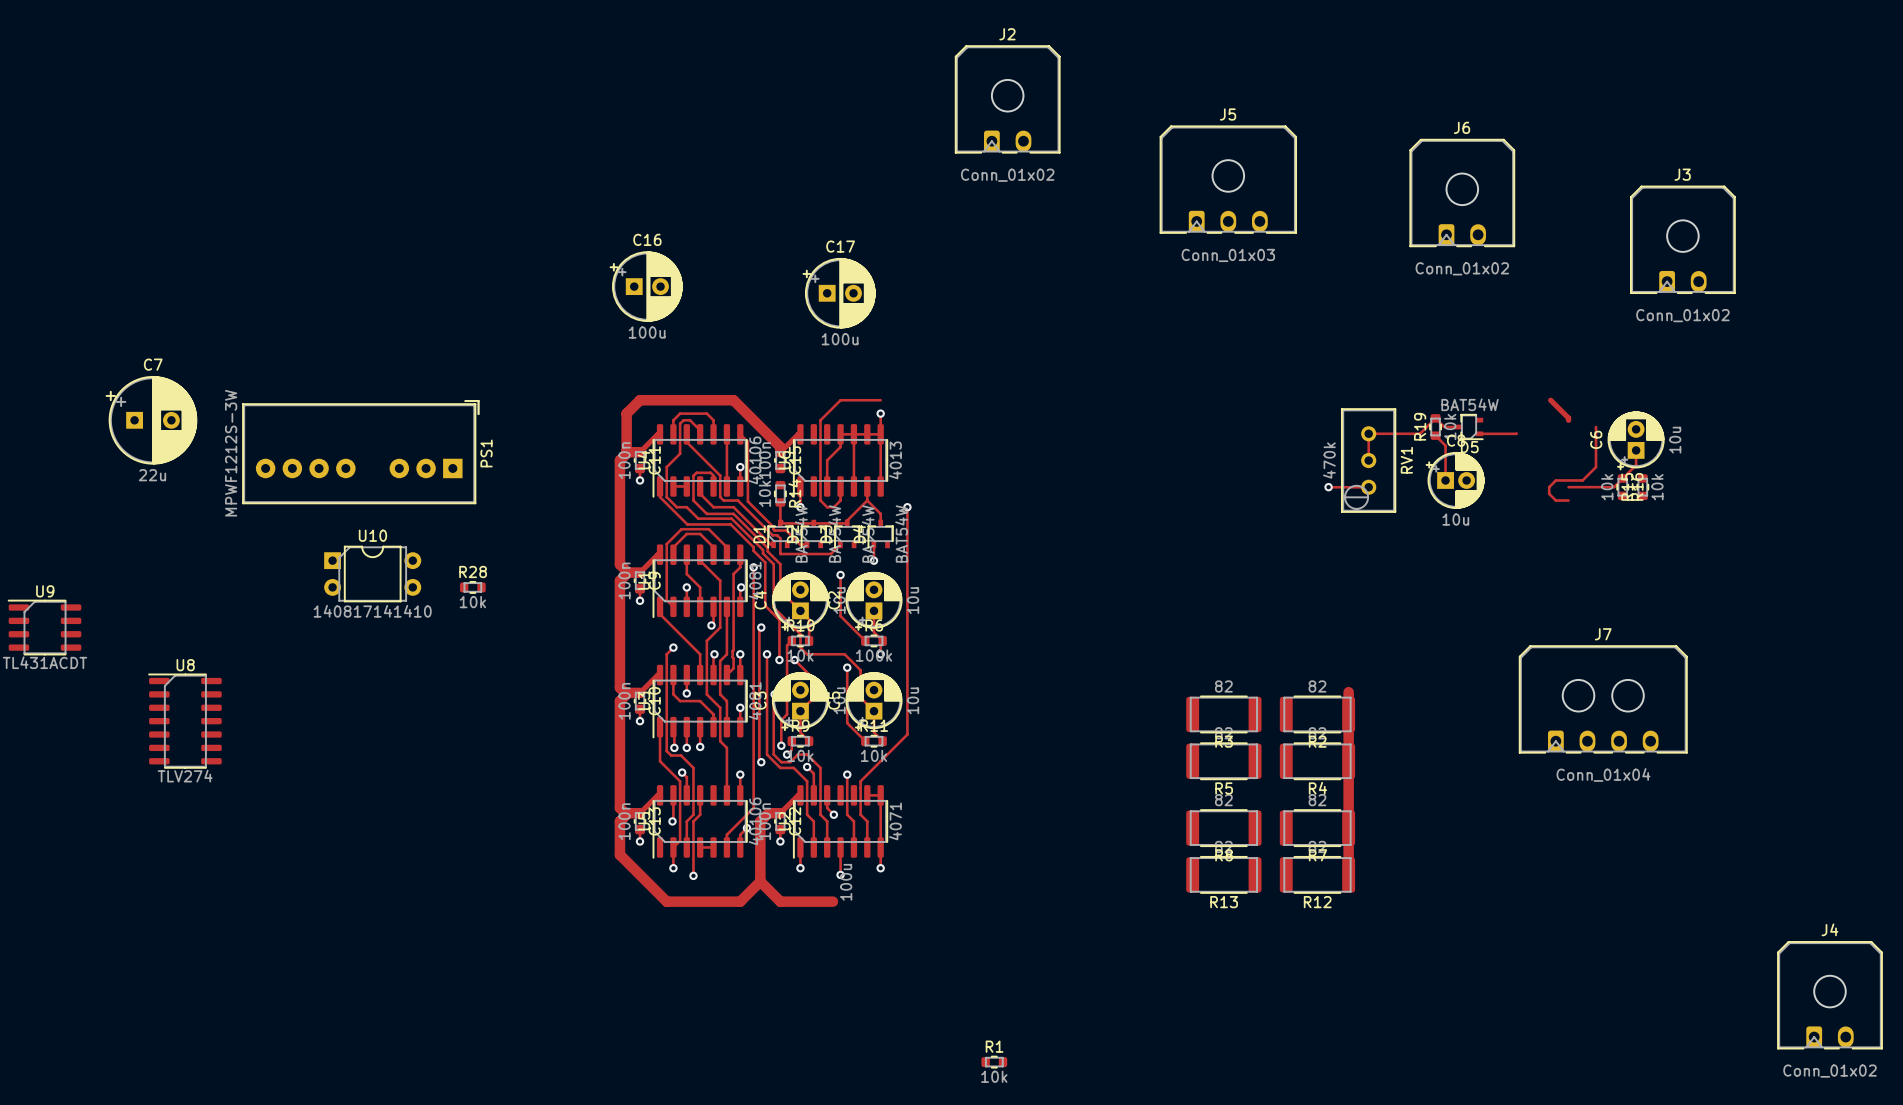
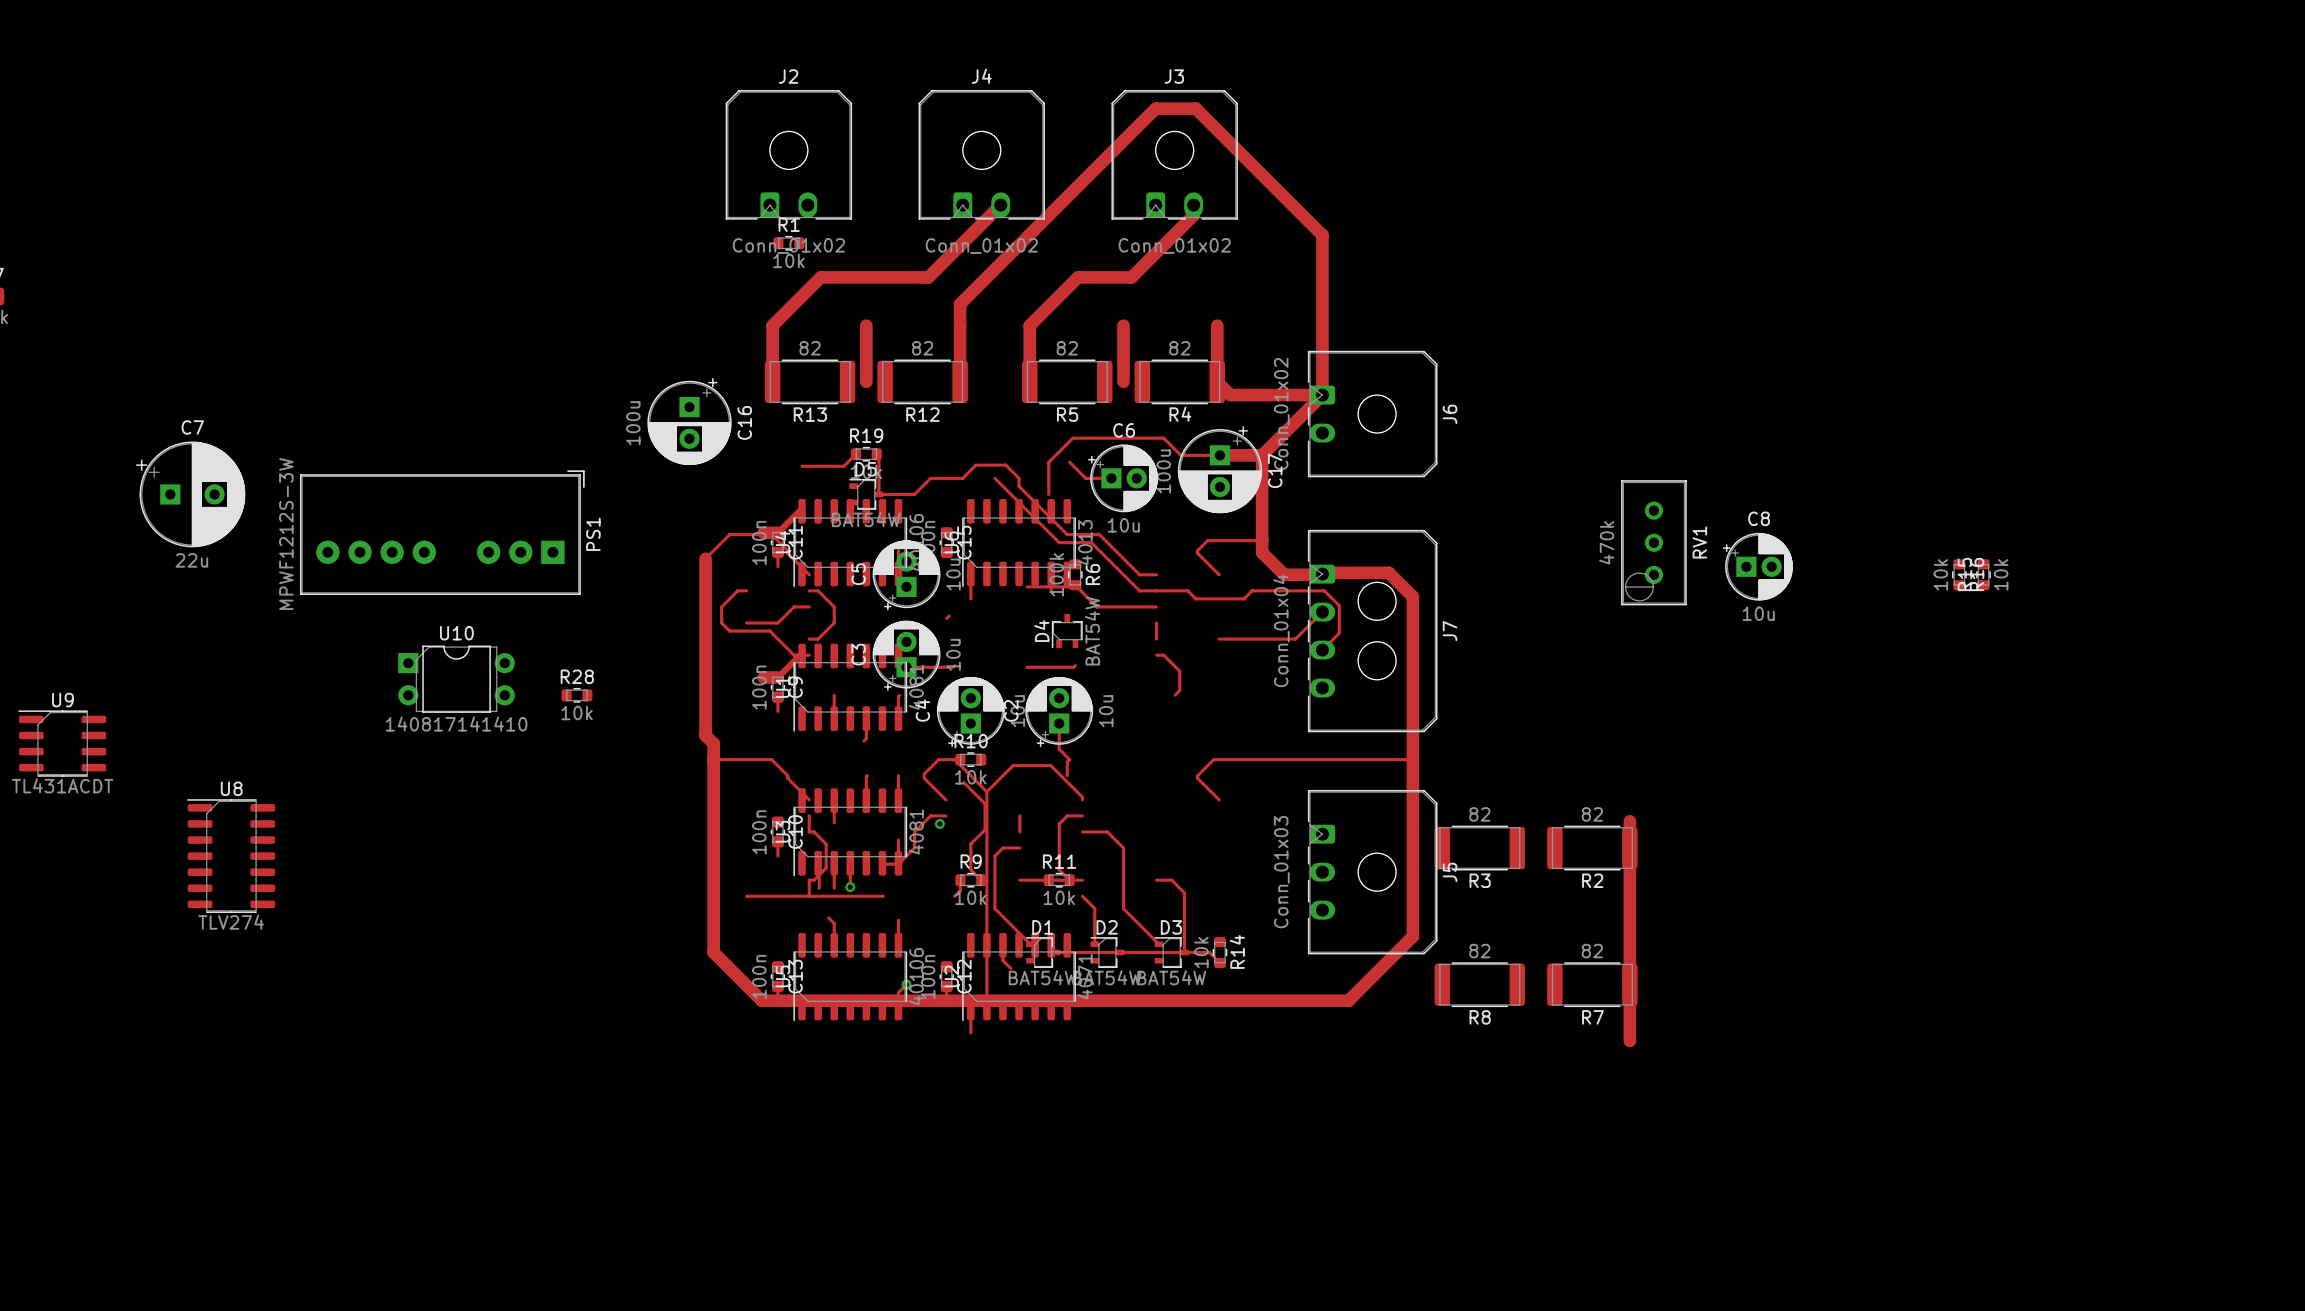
J2 position: (1007, 99) -> (788, 154)
track: none -> (1000, 205) (928, 277) (820, 277) (772, 325) (772, 381)
track: none -> (1193, 205) (1193, 215) (1131, 277) (1078, 277) (1029, 325) (1029, 381)
J5 rotation: 0° (1228, 179) -> 90° clockwise (1372, 872)
J5 position: (1228, 179) -> (1372, 872)
J6 rotation: 0° (1462, 193) -> 90° clockwise (1372, 414)
J6 position: (1462, 193) -> (1372, 414)
J3 position: (1682, 239) -> (1174, 154)
track: none -> (866, 325) (866, 381)
track: none -> (1123, 325) (1123, 381)
track: none -> (1217, 325) (1217, 381) (1230, 395) (1322, 395)
C16 rotation: 0° (646, 286) -> 90° clockwise (689, 421)
C16 position: (646, 286) -> (689, 421)
C17 rotation: 0° (839, 293) -> 90° clockwise (1219, 469)
C17 position: (839, 293) -> (1219, 469)
track: none -> (960, 381) (960, 304) (1155, 108) (1195, 108) (1322, 235) (1322, 395)
track: none -> (1322, 395) (1262, 455)
track: none -> (855, 454) (843, 466) (802, 466)
track: none -> (876, 454) (879, 456) (879, 494) (914, 494) (930, 478) (962, 478) (976, 465) (1005, 465) (1019, 478) (1019, 486) (1067, 534) (1099, 534) (1139, 574) (1156, 574)
track: none -> (1262, 455) (1262, 552) (1284, 574) (1388, 572) (1412, 596) (1412, 936) (1348, 1000) (761, 1000) (713, 952) (713, 743) (705, 735) (705, 558) (729, 534) (771, 534) (809, 574)
track: none -> (1262, 455) (1180, 455) (1163, 438) (1072, 438) (1048, 462) (1048, 494)
track: none -> (1069, 462) (1085, 478) (1111, 478)
track: (880, 400) (840, 400) (820, 420) (820, 500) (827, 507) (833, 507) (840, 500) (840, 486) -> none
track: (1550, 400) (1568, 420) -> none
track: none -> (994, 478) (1059, 542) (1091, 542) (1139, 590) (1187, 590) (1195, 598) (1244, 598) (1252, 590) (1324, 590) (1339, 605) (1339, 633) (1322, 650)
track: (880, 413) (880, 486) -> none
via: (880, 413) -> none
R19 rotation: 0° (1435, 426) -> 90° clockwise (866, 454)
R19 position: (1435, 426) -> (866, 454)
track: (1458, 426) (1444, 426) (1435, 418) (1420, 433) (1368, 433) (1368, 460) -> none
D5 rotation: 0° (1469, 426) -> 180° (866, 494)
D5 position: (1469, 426) -> (866, 494)
track: (1596, 426) (1596, 467) (1582, 480) (1555, 480) (1549, 487) (1549, 493) (1555, 500) (1568, 500) -> none
track: (1516, 433) (1479, 433) -> none
track: (673, 434) (673, 420) (680, 413) (706, 413) (713, 420) (713, 434) -> none
track: (686, 434) (686, 442) (720, 475) (720, 497) (723, 500) (737, 500) (772, 535) (777, 535) (780, 538) (780, 554) (830, 554) (840, 544) -> none
track: (700, 434) (700, 430) (690, 420) (683, 420) (680, 423) (680, 453) (666, 467) (666, 497) (676, 507) (686, 507) (698, 518) (731, 518) (763, 550) (763, 553) (773, 564) (773, 607) (800, 634) (800, 647) (807, 654) (844, 654) (860, 670) (860, 697) (873, 711) -> (1082, 815) (1067, 815) (1059, 823) (1059, 844)
track: (726, 434) (726, 486) -> none
track: (740, 434) (747, 441) (747, 501) (773, 527) (774, 530) (786, 530) (800, 544) (806, 544) -> none
track: (800, 434) (780, 452) (780, 447) (733, 400) (640, 400) (626, 413) (628, 452) (619, 460) (619, 564) (628, 572) (619, 580) (619, 687) (625, 692) (640, 692) (660, 675) -> none
track: (853, 434) (853, 486) -> none
track: (880, 434) (840, 434) (840, 447) (827, 460) (827, 486) -> none
track: (1435, 435) (1445, 445) (1445, 480) -> none
C6 rotation: 0° (1636, 440) -> 90° clockwise (1122, 478)
C6 position: (1636, 440) -> (1122, 478)
track: (1636, 450) (1636, 465) (1614, 487) (1568, 487) -> none
track: none -> (1262, 540) (1207, 540) (1197, 550) (1197, 553) (1219, 574)
via: (740, 467) -> none
via: (640, 480) -> none
track: (660, 486) (660, 497) (687, 524) (730, 524) (753, 547) (753, 550) (765, 562) (765, 605) (779, 619) (779, 660) -> none
track: (673, 486) (686, 486) -> none
track: (700, 486) (700, 493) (713, 507) (733, 507) (770, 544) (773, 544) -> none
track: (713, 486) (713, 475) (710, 472) (696, 472) (693, 475) (693, 500) (706, 513) (733, 513) (767, 548) (767, 551) (780, 564) (780, 590) (809, 619) (809, 640) -> none
track: (1328, 487) (1368, 487) -> none
via: (1328, 487) -> none
R14 position: (780, 493) -> (1219, 952)
track: none -> (1027, 586) (1073, 586) (1075, 585) (1097, 606) (1156, 606)
track: none -> (746, 590) (737, 590) (721, 606) (721, 623) (729, 631) (769, 631) (794, 655) (809, 655)
track: none -> (809, 590) (818, 590) (834, 606) (834, 623) (818, 639) (809, 639)
track: (780, 502) (780, 523) (847, 523) (847, 520) (867, 500) (880, 513) (880, 523) -> none
via: (800, 507) -> none
track: (907, 507) (907, 734) (860, 781) (860, 814) (867, 821) (867, 847) -> none
via: (907, 507) -> none
track: none -> (809, 606) (794, 606) (777, 623) (746, 623)
track: none -> (1322, 612) (1295, 639) (1219, 639)
track: none -> (1156, 623) (1156, 639)
D1 rotation: 0° (780, 534) -> 90° clockwise (1043, 952)
D1 position: (780, 534) -> (1043, 952)
D2 rotation: 0° (813, 534) -> 90° clockwise (1107, 952)
D2 position: (813, 534) -> (1107, 952)
D3 rotation: 0° (847, 534) -> 90° clockwise (1171, 952)
D3 position: (847, 534) -> (1171, 952)
track: (873, 544) (873, 560) -> none
track: (673, 554) (673, 547) (686, 533) (700, 533) (713, 547) (713, 554) -> none
track: (686, 554) (686, 574) (700, 587) (700, 606) -> none
track: (700, 554) (700, 560) (720, 580) (720, 627) (706, 640) (706, 694) (720, 707) (720, 741) (726, 747) (726, 795) -> none
track: (726, 554) (726, 547) (708, 529) (681, 529) (666, 544) (666, 600) (673, 606) -> none
track: (740, 554) (740, 567) (733, 574) (733, 668) (726, 675) -> none
track: none -> (1156, 655) (1163, 655) (1179, 671) (1179, 690) (1175, 695)
via: (873, 560) -> none
track: none -> (954, 665) (953, 667) (906, 667)
track: none -> (1075, 665) (1073, 667) (1027, 667)
track: (753, 567) (753, 701) -> (945, 815) (930, 815) (914, 831)
via: (753, 567) -> none
track: (840, 575) (840, 616) (865, 640) -> none
via: (840, 575) -> none
via: (686, 587) -> none
via: (741, 587) -> none
via: (640, 600) -> none
track: (660, 606) (660, 614) (700, 654) (700, 675) -> none
track: (726, 606) (726, 654) (720, 660) (720, 694) (726, 701) (726, 727) -> none
via: (711, 625) -> none
track: (761, 627) (759, 629) (759, 760) (761, 762) -> none
via: (761, 627) -> none
track: none -> (713, 759) (771, 759) (809, 799)
track: (791, 640) (787, 645) (787, 714) (781, 720) (781, 745) -> none
R6 rotation: 0° (873, 640) -> 90° clockwise (1075, 574)
R6 position: (873, 640) -> (1075, 574)
track: none -> (1412, 759) (1213, 759) (1197, 775) (1197, 778) (1219, 799)
track: (673, 647) (666, 654) (666, 751) (671, 755) (681, 755) (693, 767) (693, 814) (686, 821) (686, 847) -> none
via: (673, 647) -> none
via: (714, 654) -> none
via: (740, 654) -> none
track: (767, 654) (767, 754) (780, 767) (793, 767) (807, 781) (807, 814) (813, 821) -> (986, 945) (986, 976)
via: (767, 654) -> none
via: (880, 654) -> none
via: (779, 660) -> none
via: (794, 660) -> none
track: none -> (986, 791) (1013, 765) (1050, 765) (1082, 797) (1082, 799)
track: none -> (986, 791) (954, 759) (938, 759) (924, 773) (924, 778) (945, 799)
track: (847, 667) (847, 723) (865, 741) -> none
via: (847, 667) -> none
track: (673, 675) (673, 694) (680, 701) (700, 701) (713, 714) (713, 727) -> none
track: none -> (809, 815) (809, 831) (814, 831) (826, 844) (826, 868) (814, 880) (809, 880) (809, 896)
track: none -> (1019, 815) (1019, 831)
track: (628, 692) (619, 701) (619, 808) (625, 813) (640, 813) (660, 795) -> none
via: (686, 693) -> none
track: (774, 694) (773, 754) (781, 762) (790, 762) (797, 754) (807, 754) (820, 767) (820, 814) (827, 821) (827, 847) -> none
J7 rotation: 0° (1603, 699) -> 90° clockwise (1372, 631)
J7 position: (1603, 699) -> (1372, 631)
C3 position: (800, 701) -> (906, 655)
C5 position: (873, 701) -> (906, 575)
track: none -> (1082, 831) (1107, 831) (1123, 848) (1123, 908) (1159, 944)
via: (740, 707) -> none
track: (753, 714) (753, 808) (726, 834) (726, 847) -> (914, 848) (898, 864) (883, 864)
track: none -> (1019, 848) (1002, 848) (994, 856) (994, 908) (1030, 944)
via: (640, 721) -> none
track: (660, 727) (660, 761) (680, 781) (680, 840) (673, 847) (673, 868) -> none
track: none -> (1019, 880) (1082, 880)
track: none -> (1156, 880) (1171, 880) (1184, 892) (1184, 952)
via: (781, 745) -> none
via: (674, 747) -> none
via: (686, 747) -> none
track: none -> (746, 896) (883, 896)
via: (787, 754) -> none
track: none -> (1082, 896) (1094, 908) (1094, 944)
R5 position: (1223, 761) -> (1067, 381)
R4 position: (1317, 761) -> (1179, 381)
via: (761, 762) -> none
track: (807, 767) (813, 773) -> (986, 791) (986, 919)
via: (807, 767) -> none
via: (682, 772) -> none
via: (740, 774) -> none
track: (847, 774) (847, 814) (853, 821) (853, 847) -> none
via: (847, 774) -> none
track: (673, 795) (672, 821) -> none
track: (700, 795) (700, 814) (693, 821) (693, 875) -> none
track: (800, 795) (780, 813) (768, 813) (760, 821) (760, 881) -> none
track: (867, 795) (880, 795) (880, 868) -> none
track: none -> (1055, 952) (1209, 952) (1219, 962)
track: (628, 813) (619, 821) (619, 854) (666, 901) (740, 901) (760, 881) -> none
via: (833, 814) -> none
via: (672, 821) -> none
via: (640, 841) -> none
via: (780, 841) -> none
track: (700, 847) (713, 847) -> none
track: (840, 847) (840, 874) -> none
via: (673, 868) -> none
via: (800, 868) -> none
via: (880, 868) -> none
via: (840, 874) -> none
R13 position: (1223, 874) -> (810, 381)
R12 position: (1317, 874) -> (922, 381)
via: (693, 875) -> none
track: (760, 881) (780, 901) (832, 901) -> none
text: 100u (846, 882) -> none
J4 position: (1829, 995) -> (981, 154)
R1 position: (994, 1062) -> (788, 243)

